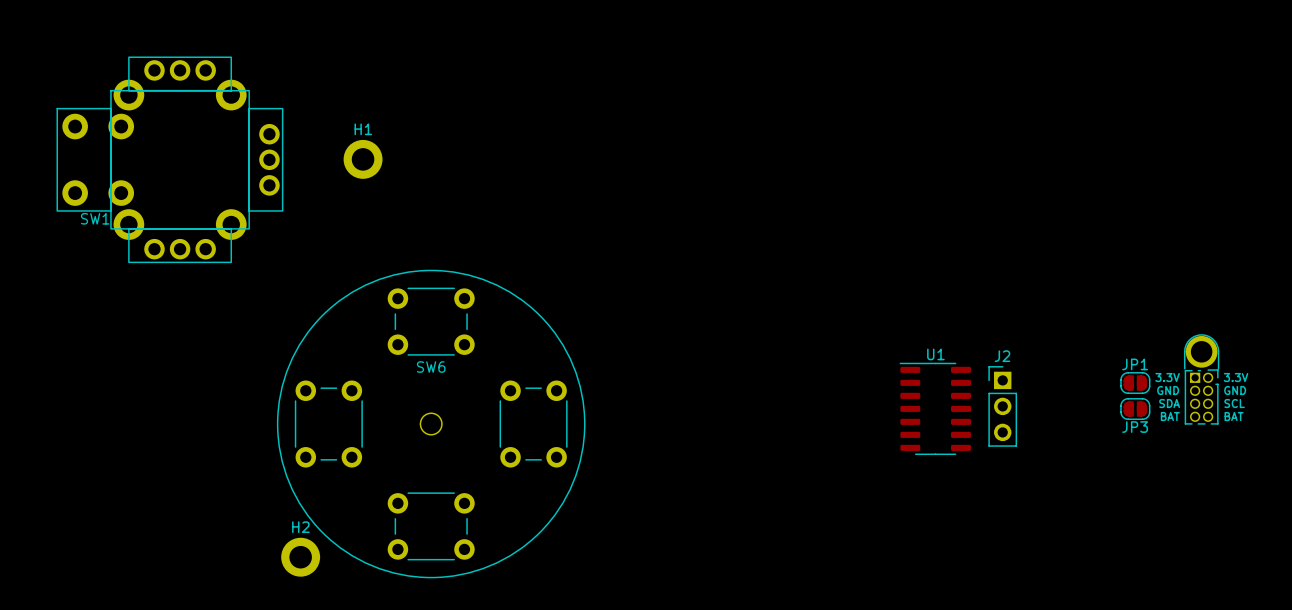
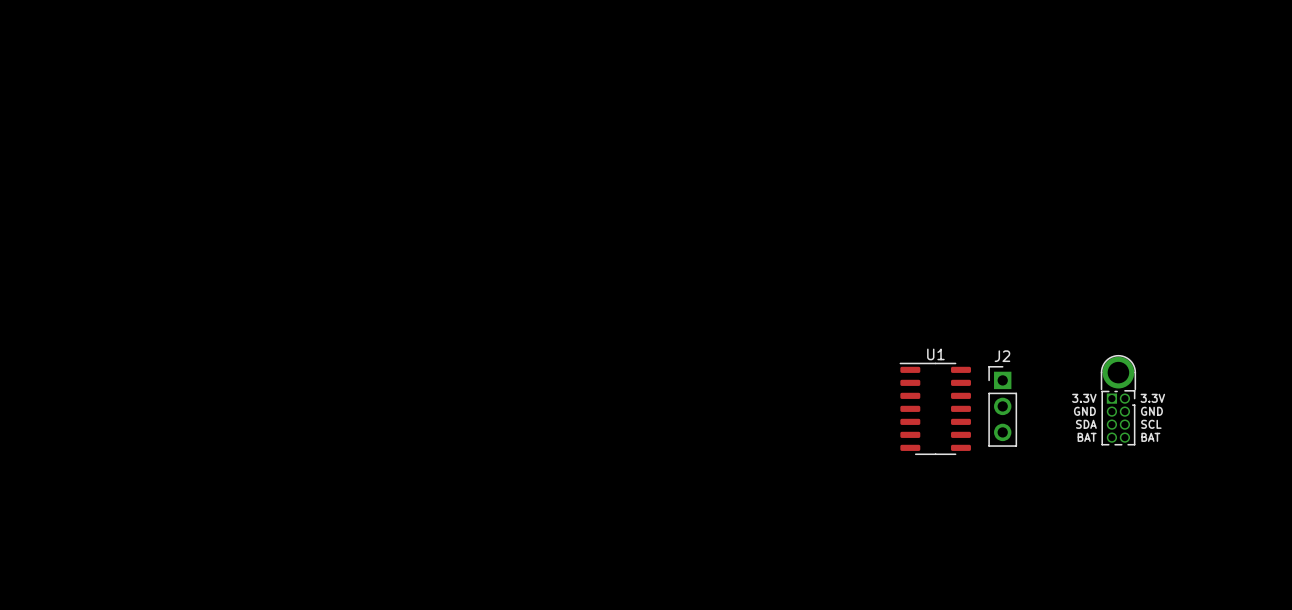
SW1: (169, 159) -> none
H1: (363, 159) -> none
part position: (1201, 379) -> (1118, 400)
JP1: (1135, 383) -> none
JP3: (1135, 409) -> none
SW6: (431, 424) -> none
H2: (300, 557) -> none

